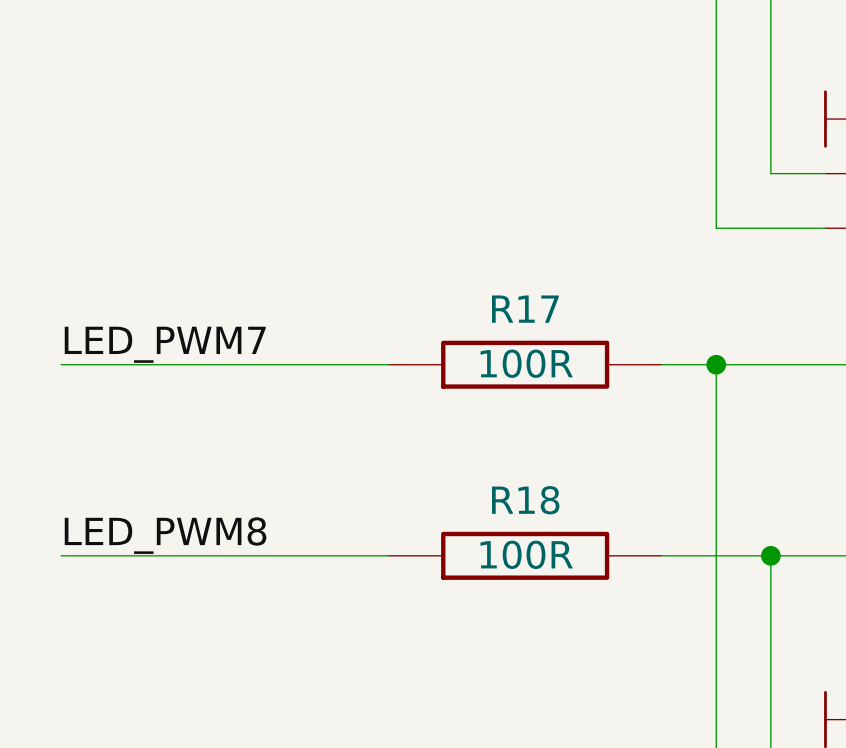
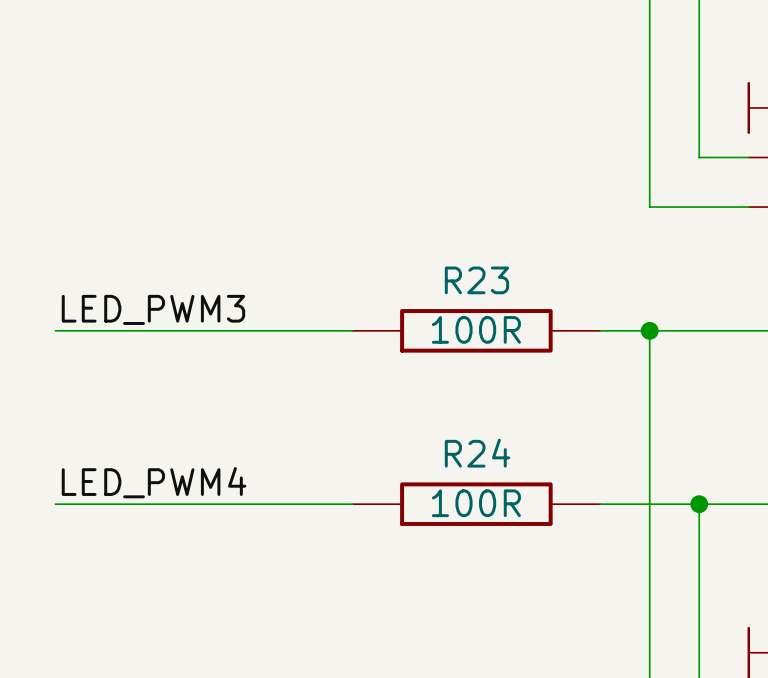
R17 name: R17 (525, 309) -> R23 (476, 280)
label: LED_PWM7 (165, 344) -> LED_PWM3 (153, 309)
R18 name: R18 (525, 500) -> R24 (477, 453)
label: LED_PWM8 (165, 535) -> LED_PWM4 (154, 482)

